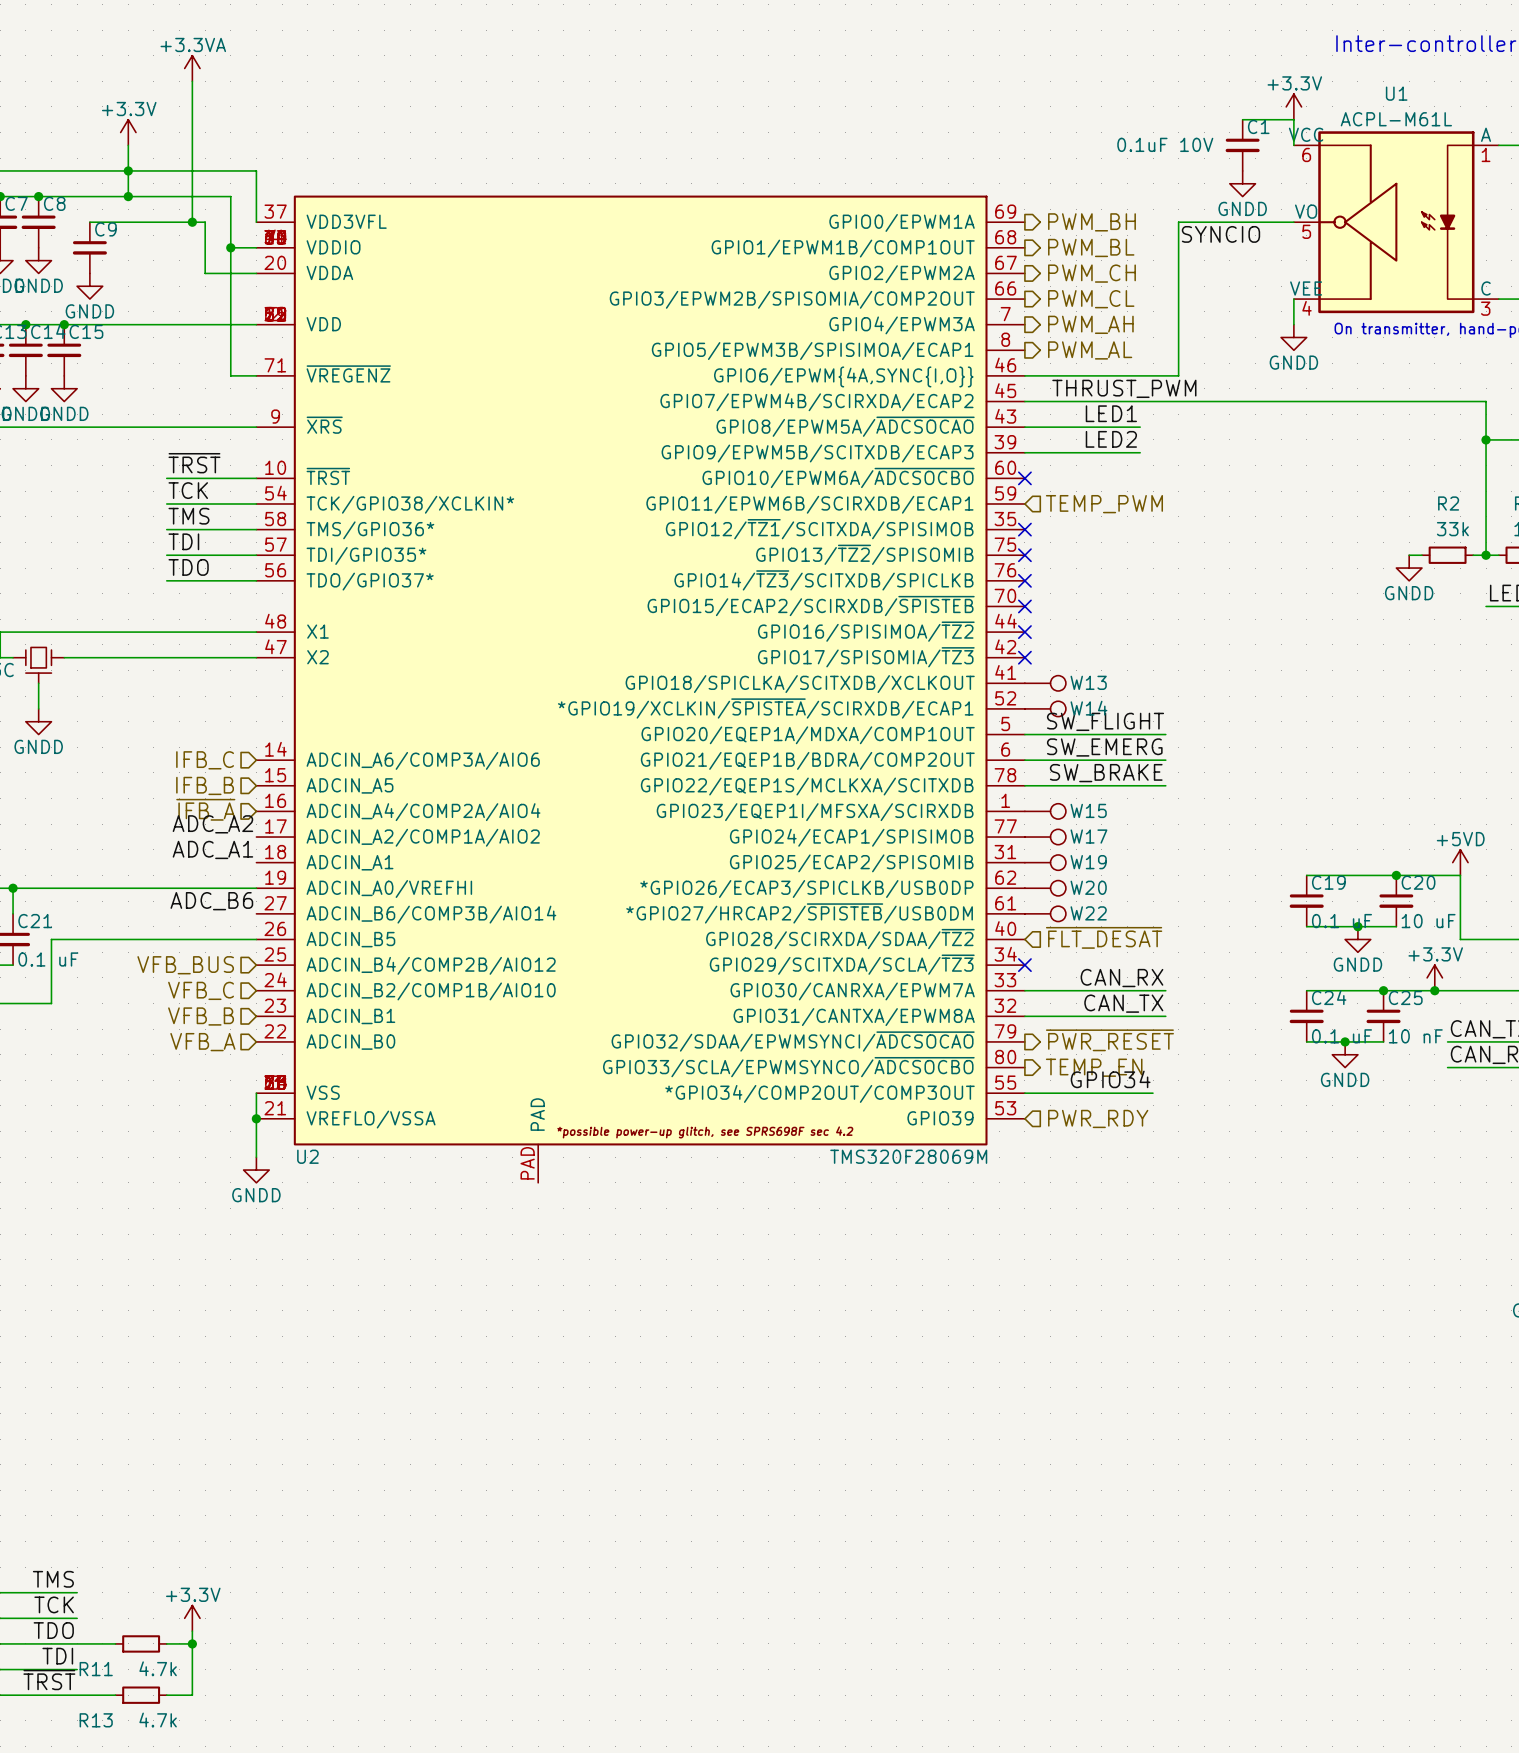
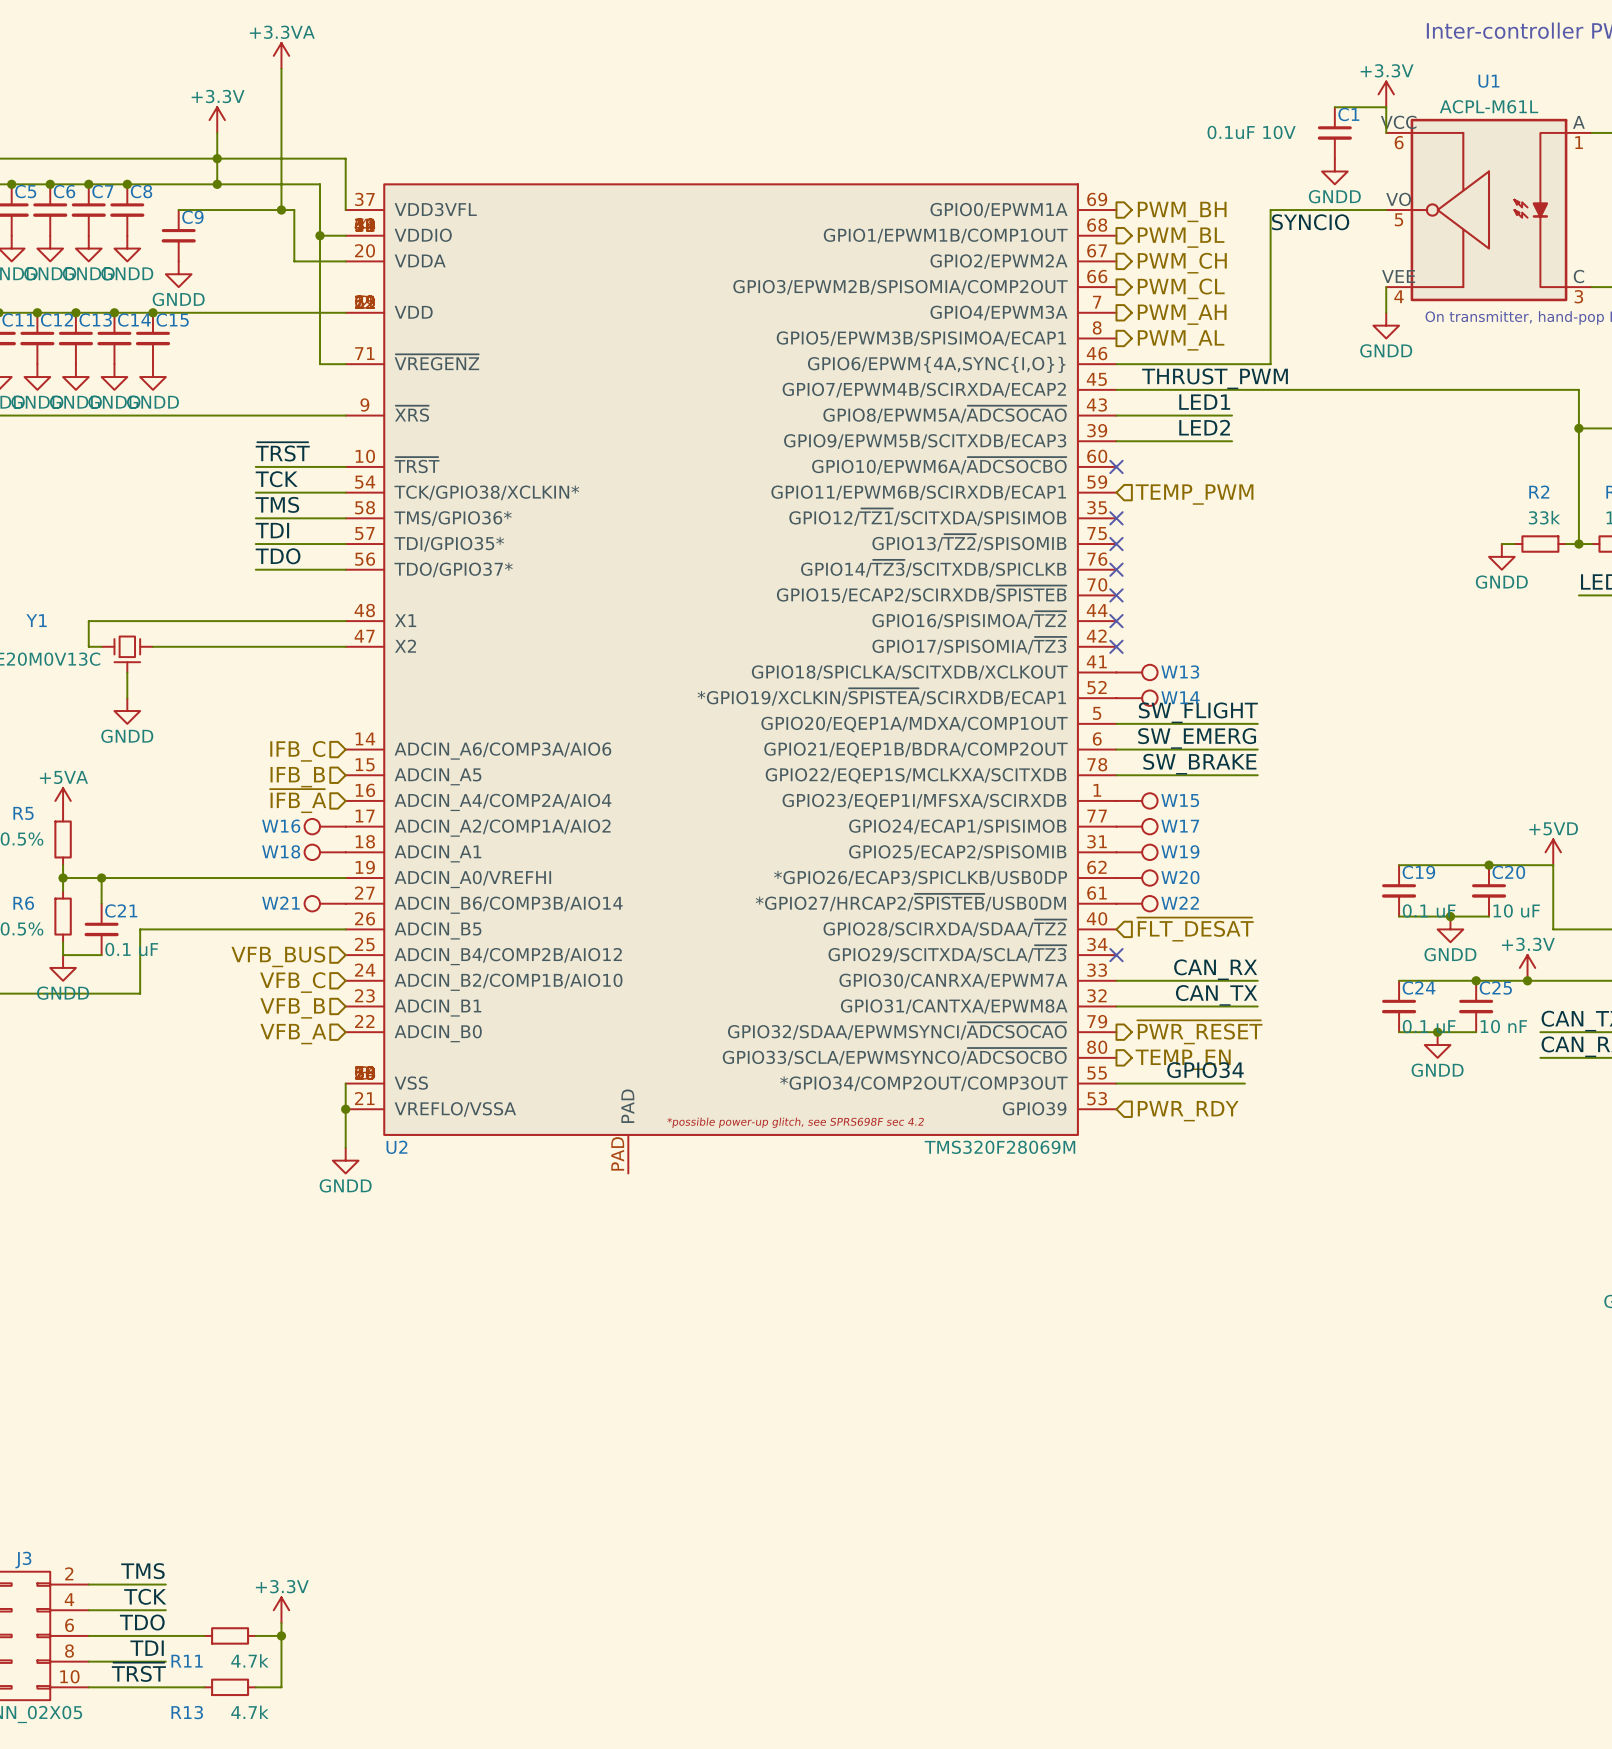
label: ADC_A2 (212, 824) -> none
W16: none -> (325, 826)
label: ADC_A1 (212, 849) -> none
W18: none -> (325, 852)
label: ADC_B6 (211, 901) -> none
W21: none -> (325, 903)

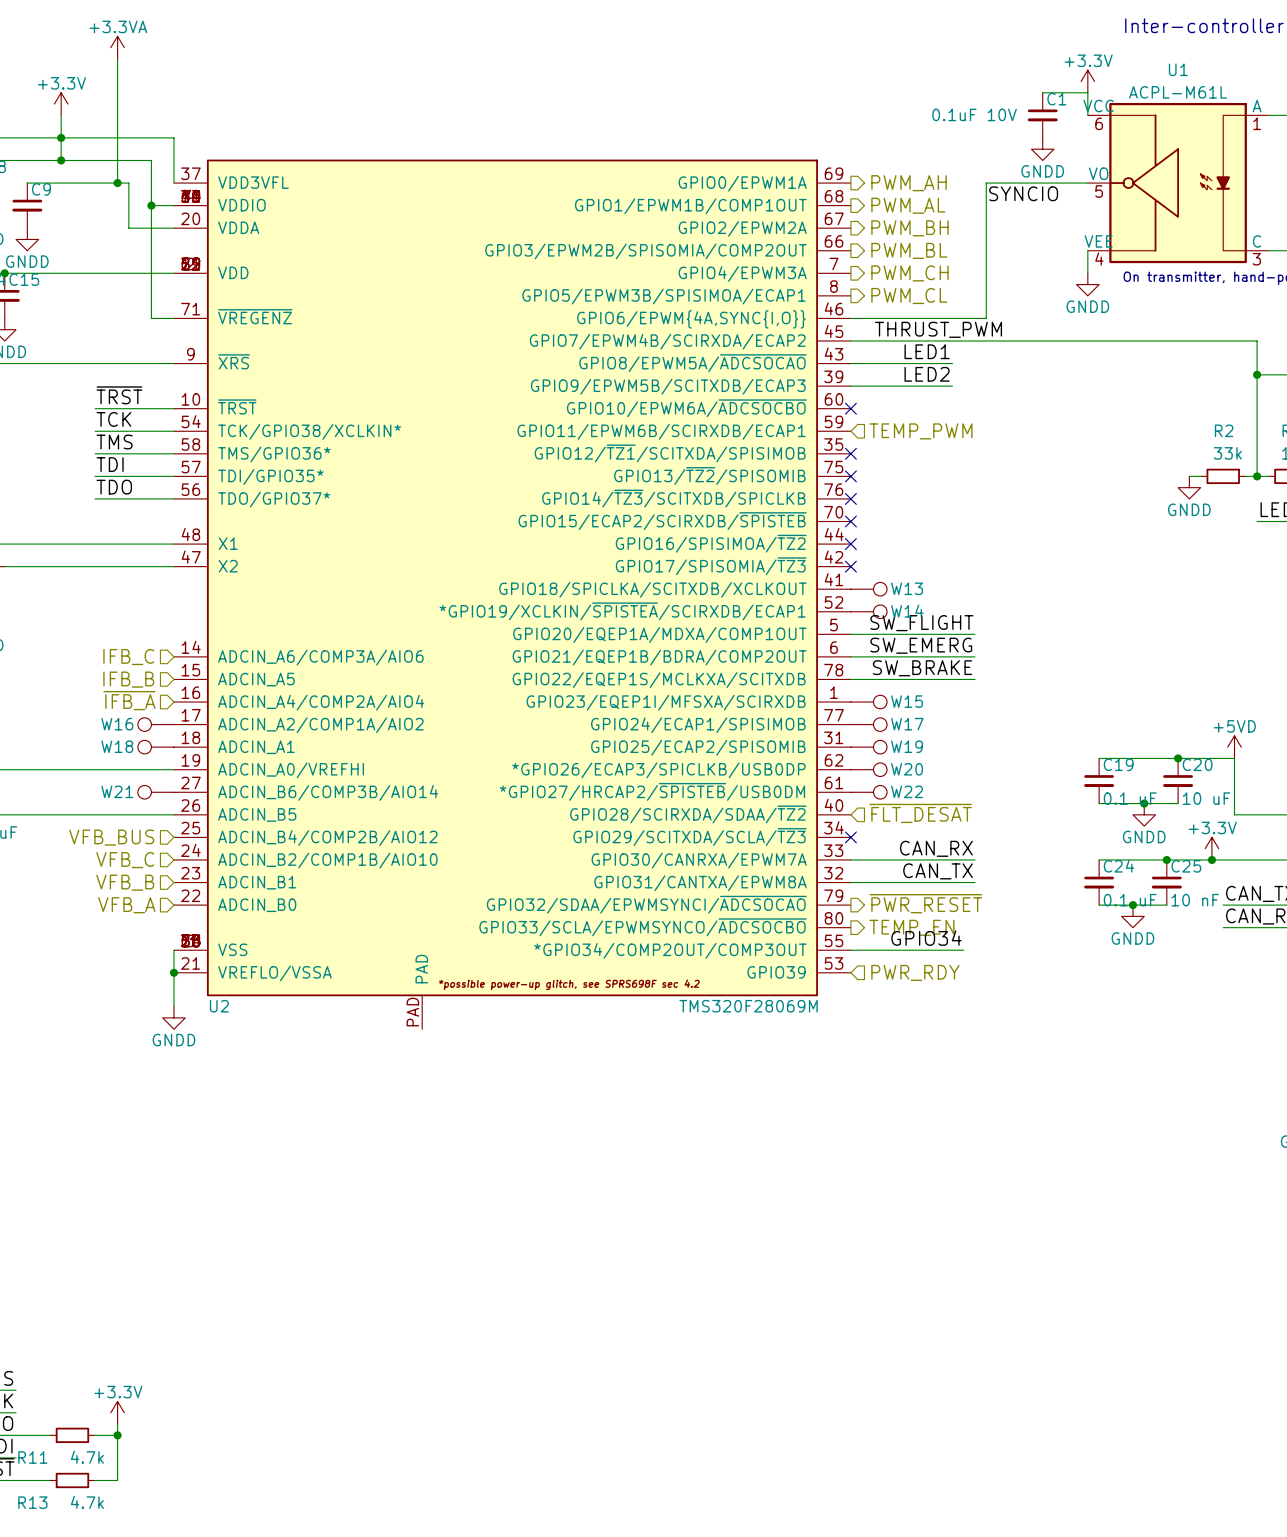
hierarchical label: PWM_BH (1182, 211) -> PWM_AH (909, 183)
hierarchical label: PWM_BL (1181, 237) -> PWM_AL (908, 205)
hierarchical label: PWM_CH (1182, 263) -> PWM_BH (909, 228)
hierarchical label: PWM_CL (1181, 288) -> PWM_BL (909, 250)
hierarchical label: PWM_AH (1182, 314) -> PWM_CH (909, 273)
hierarchical label: PWM_AL (1181, 340) -> PWM_CL (909, 296)

